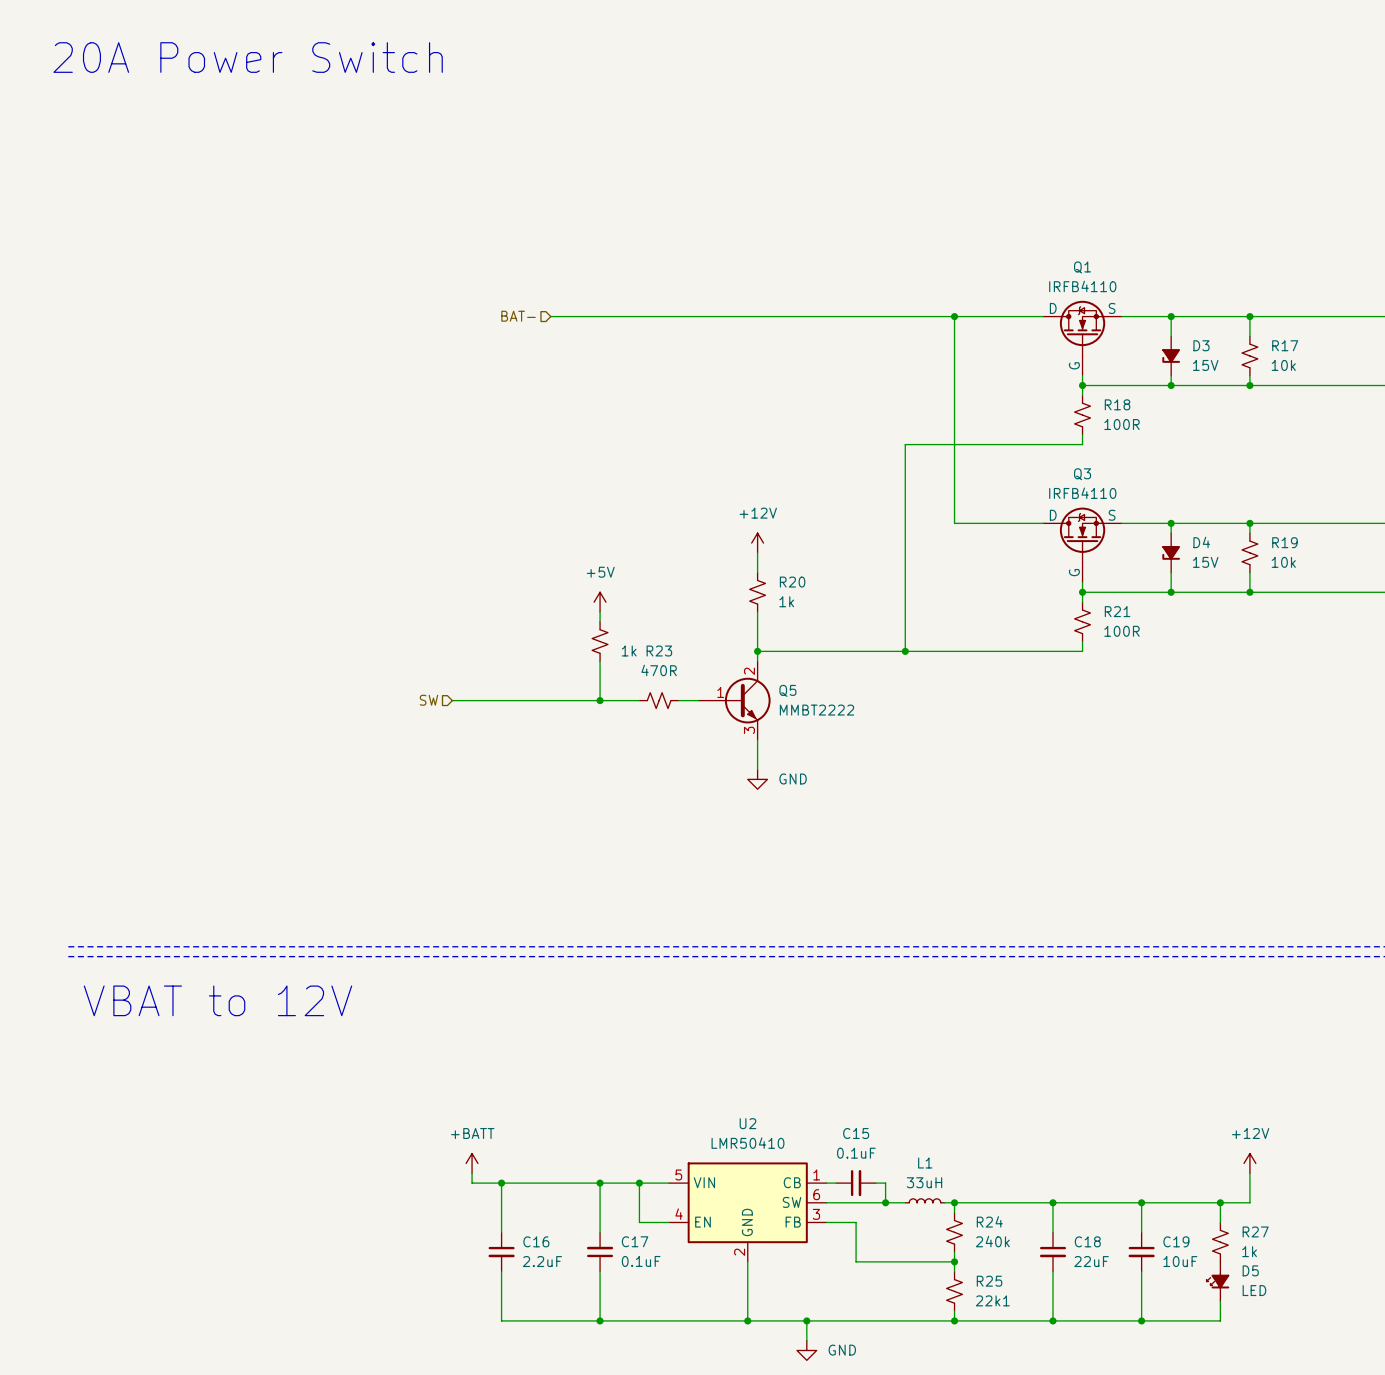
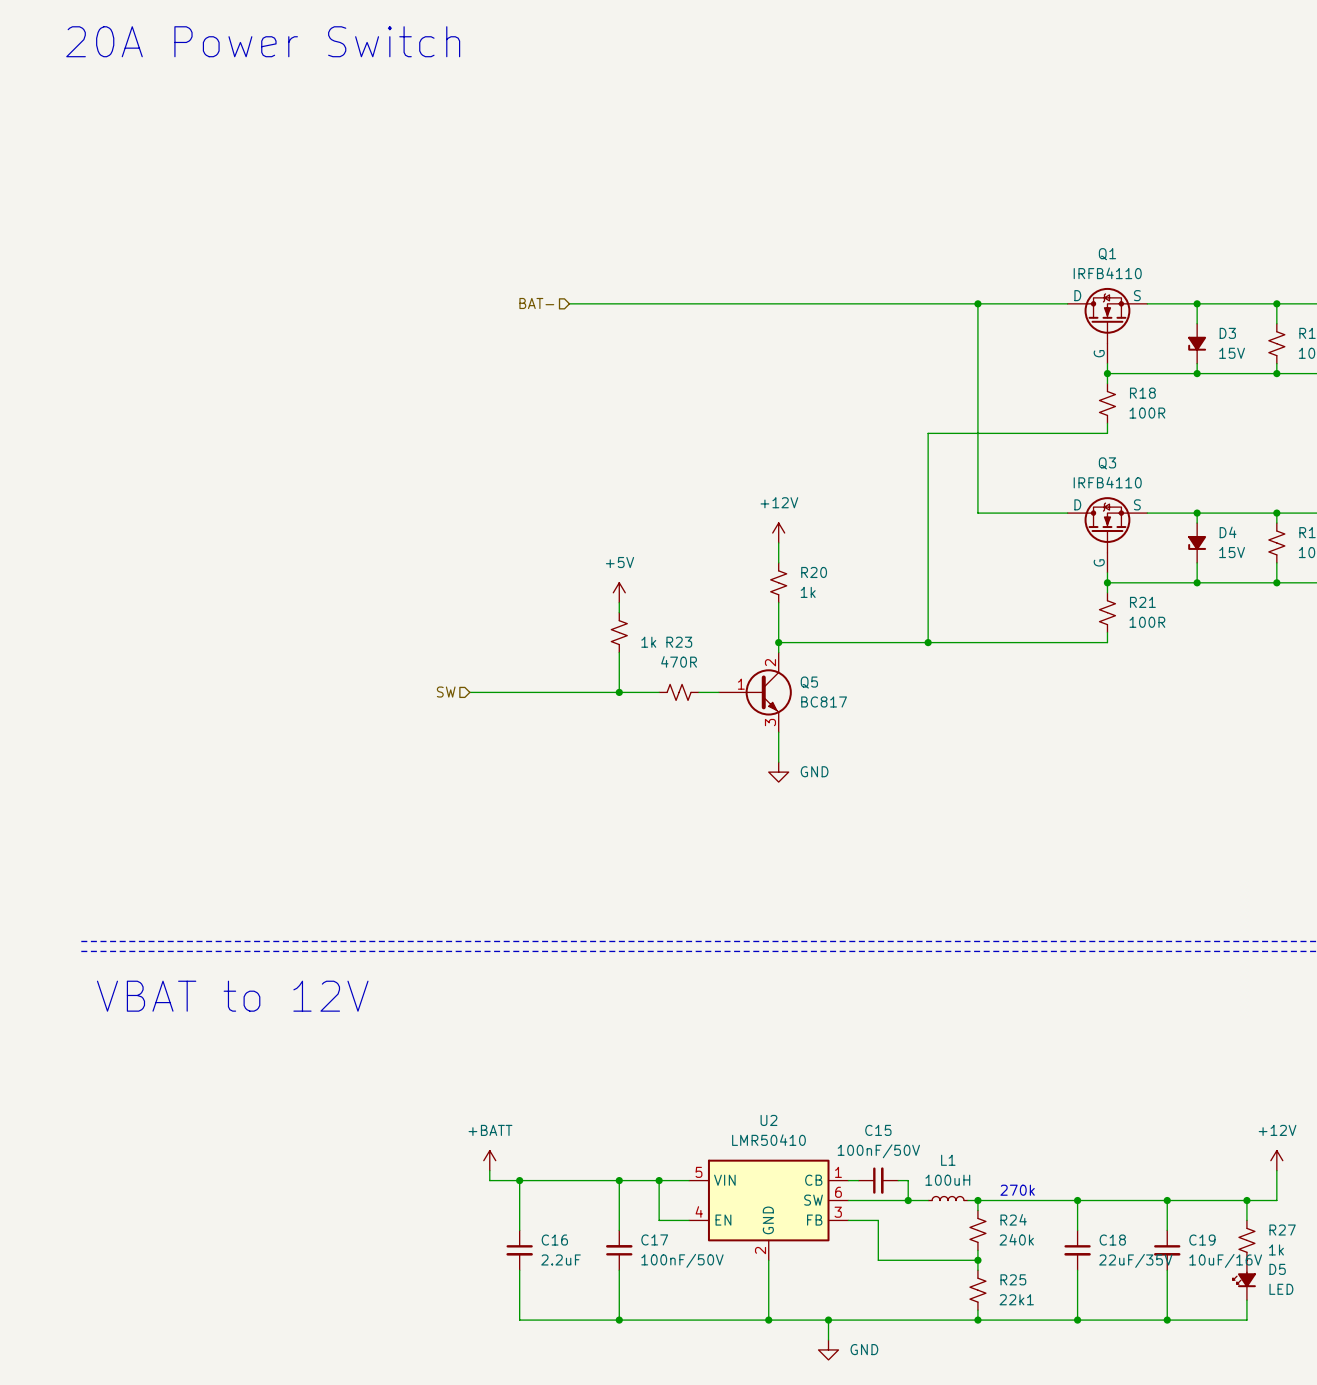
Q5 value: MMBT2222 (816, 710) -> BC817 (824, 702)
C15 value: 0.1uF (856, 1153) -> 100nF/50V (878, 1151)
L1 value: 33uH (924, 1182) -> 100uH (947, 1180)
text: none -> 270k (1017, 1190)
C17 value: 0.1uF (641, 1261) -> 100nF/50V (682, 1260)
C18 value: 22uF (1091, 1261) -> 22uF/35V (1135, 1260)
C19 value: 10uF (1180, 1261) -> 10uF/16V (1225, 1260)

